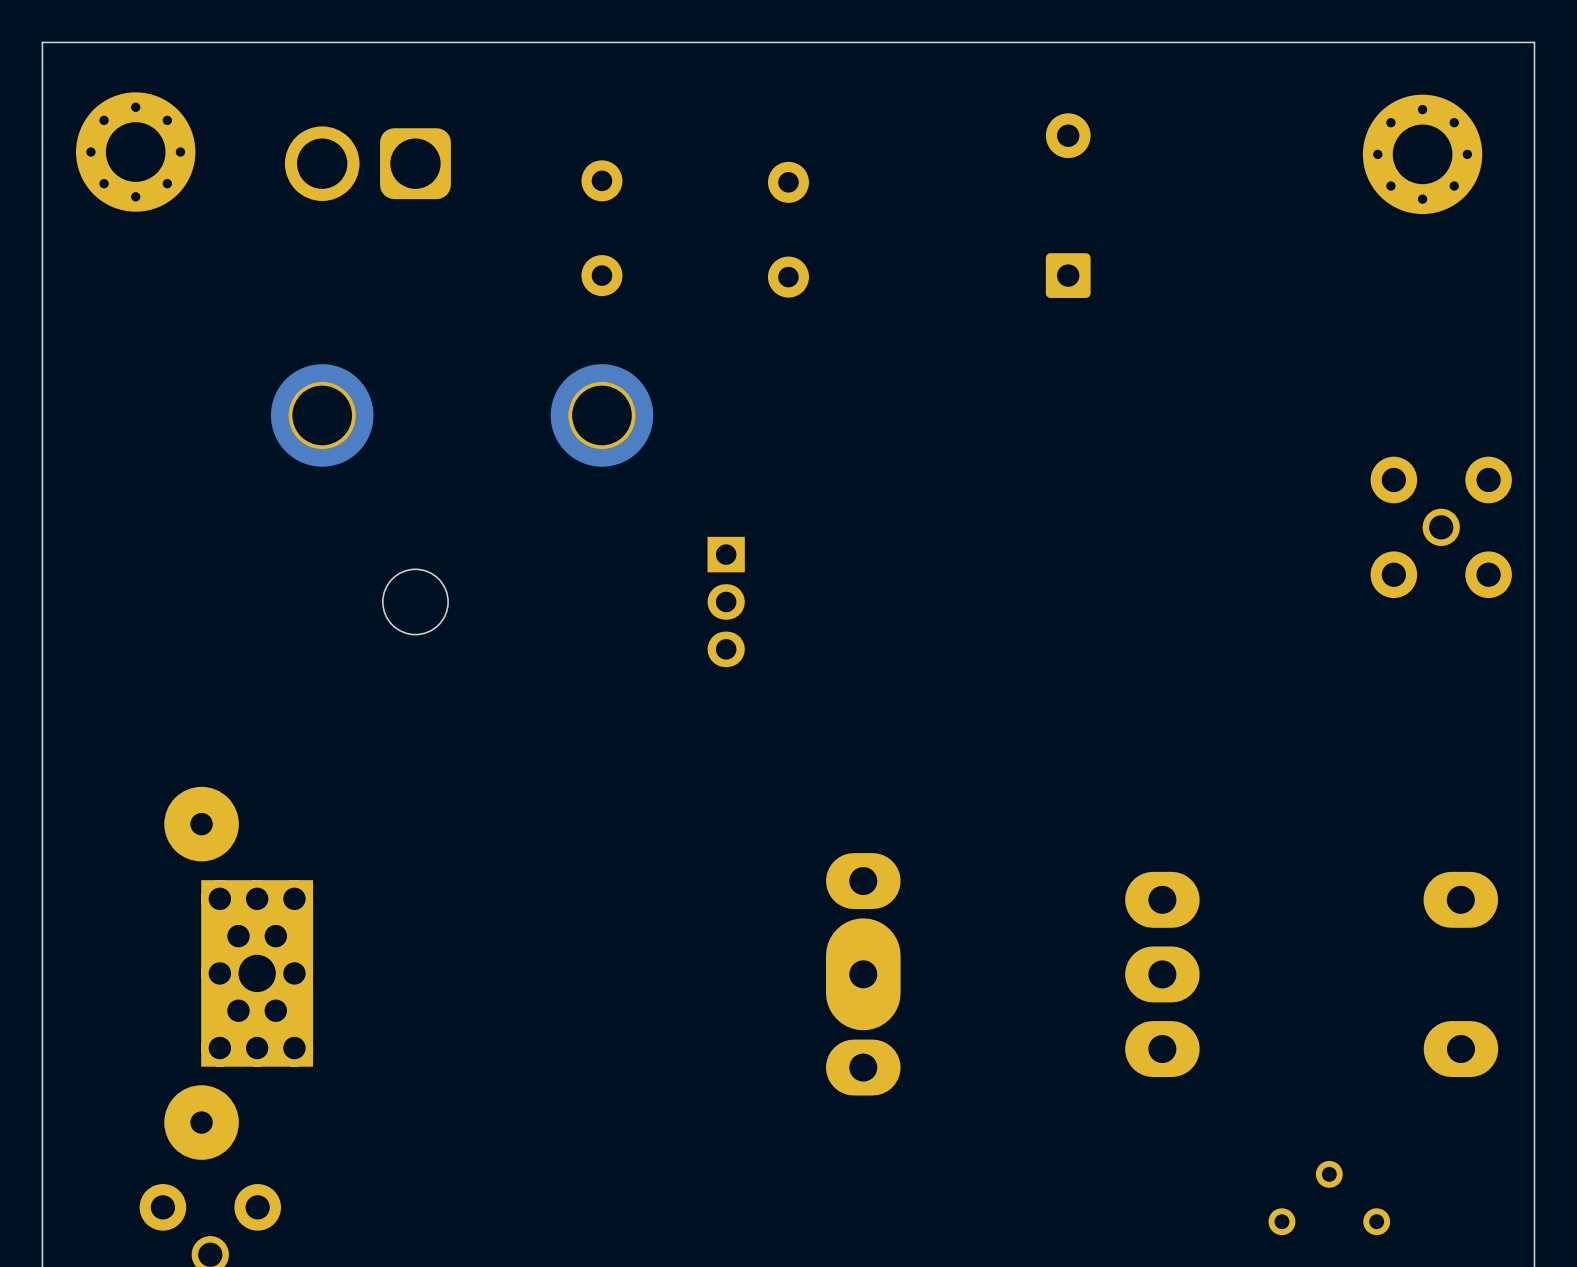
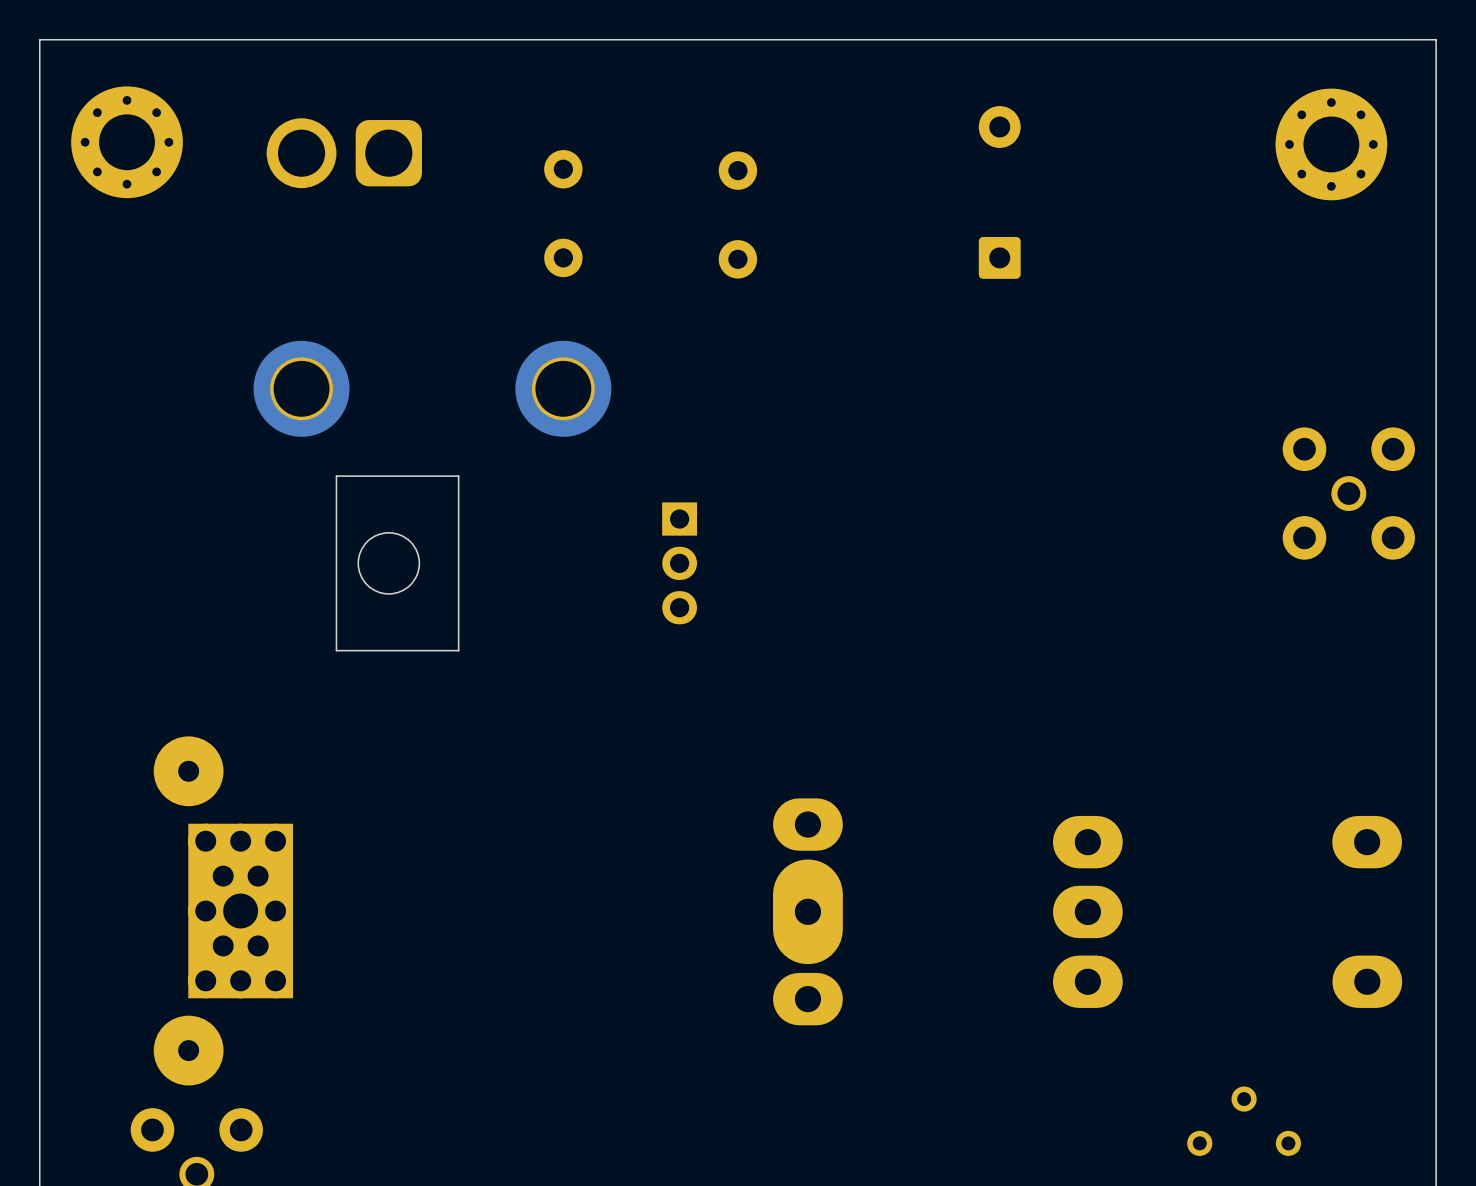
board edge: none -> (458, 476) (336, 476) (336, 650) (458, 650) (458, 476)

